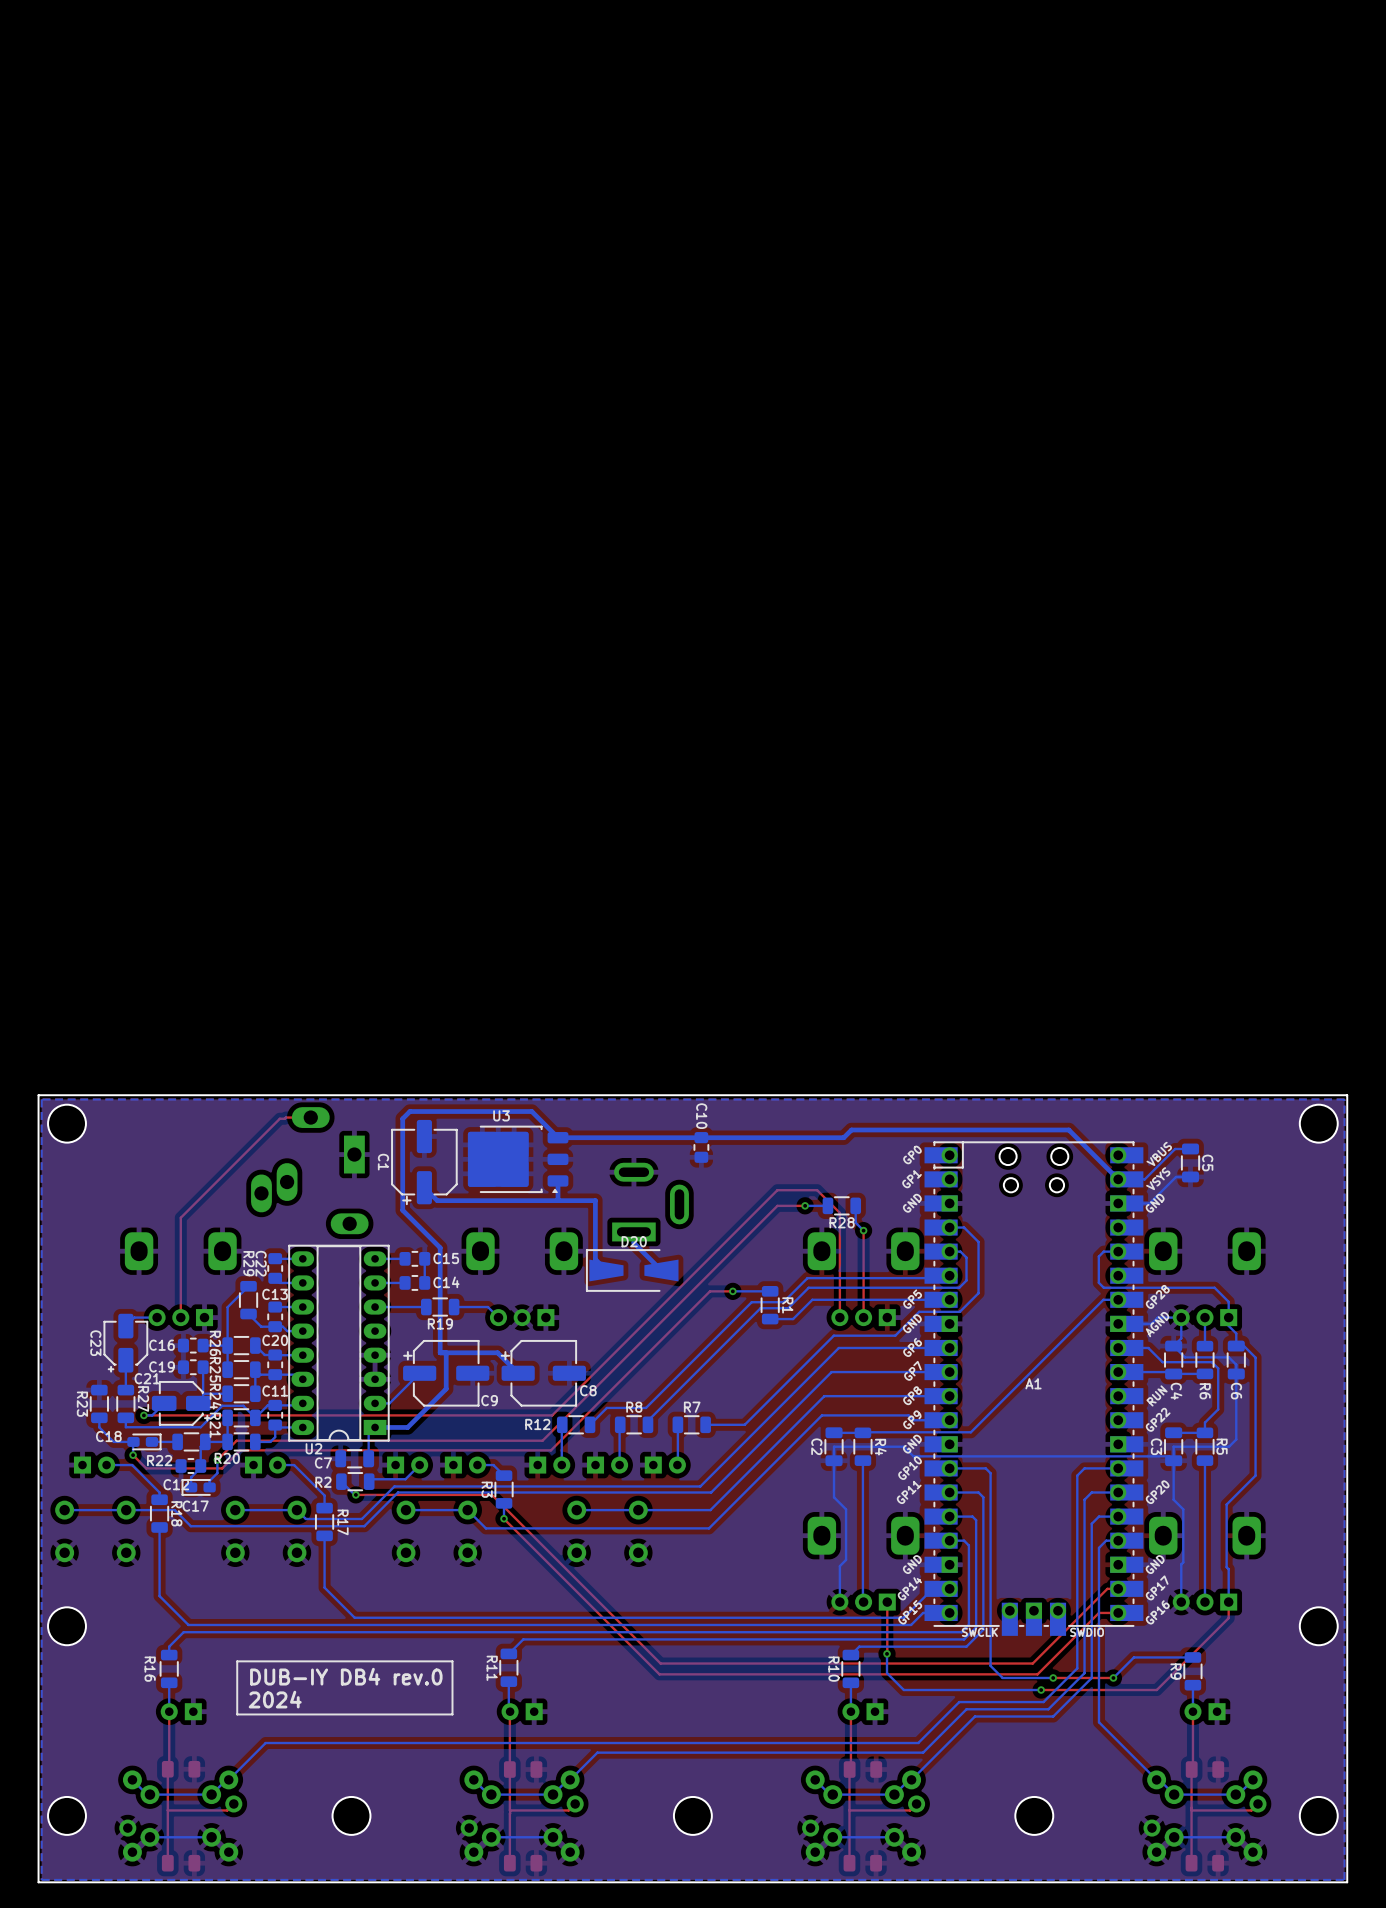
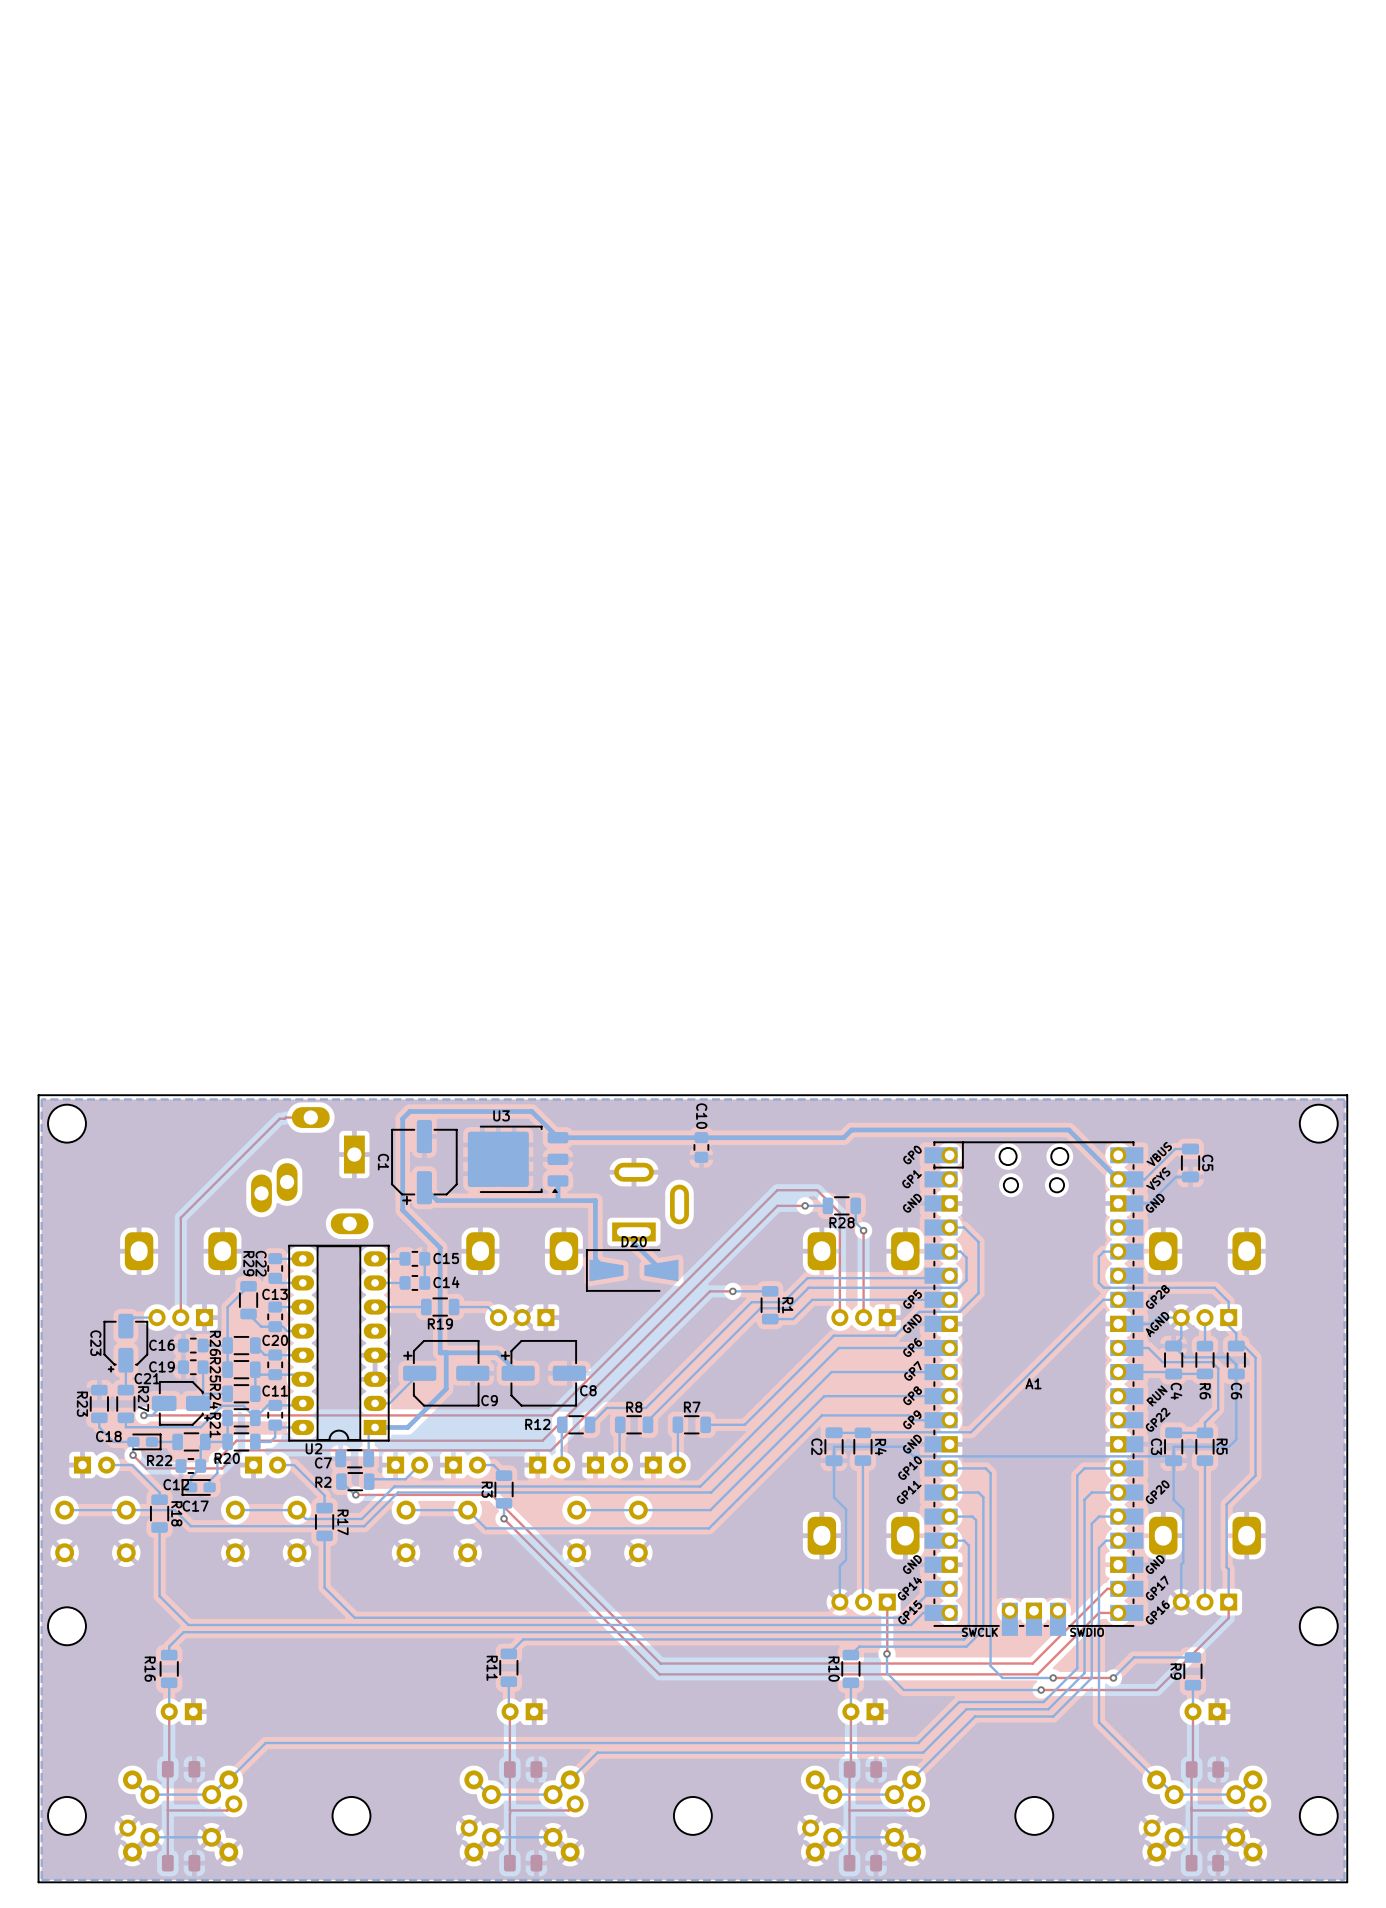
line: (452, 1661) (237, 1661) (237, 1714) (452, 1714) (452, 1661) -> none
text: DUB-IY DB4 rev.0 (346, 1676) -> none
text: 2024 (275, 1699) -> none

